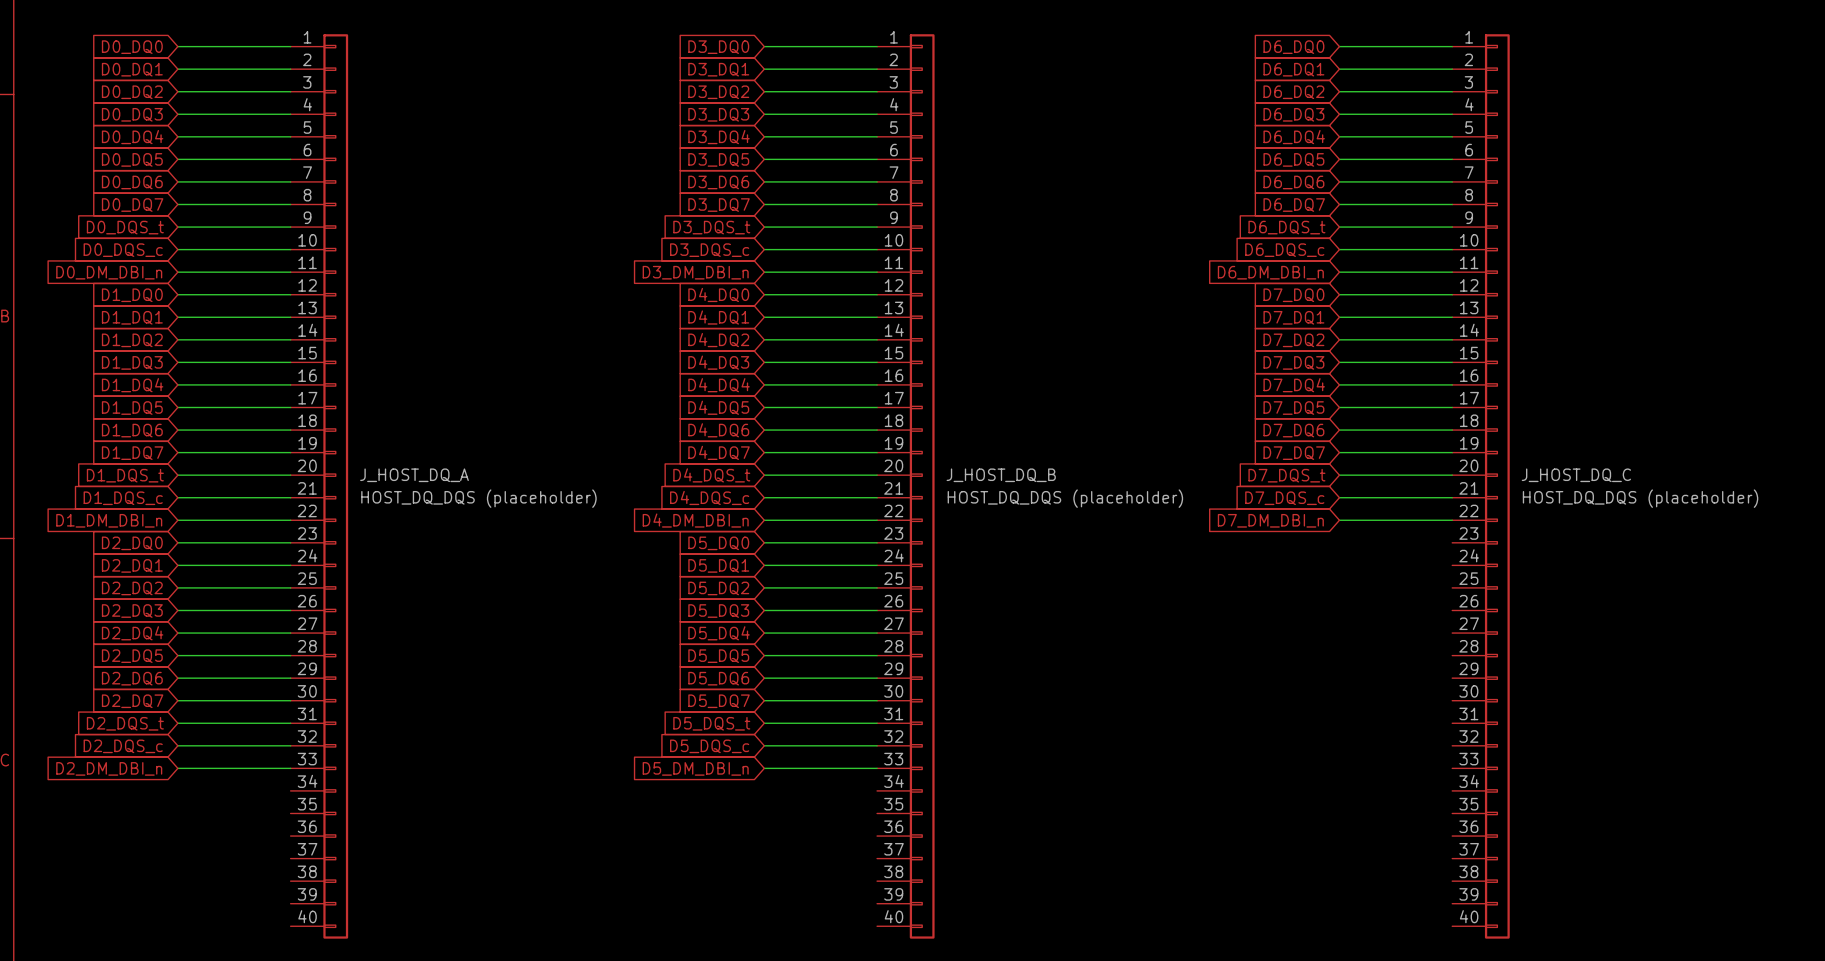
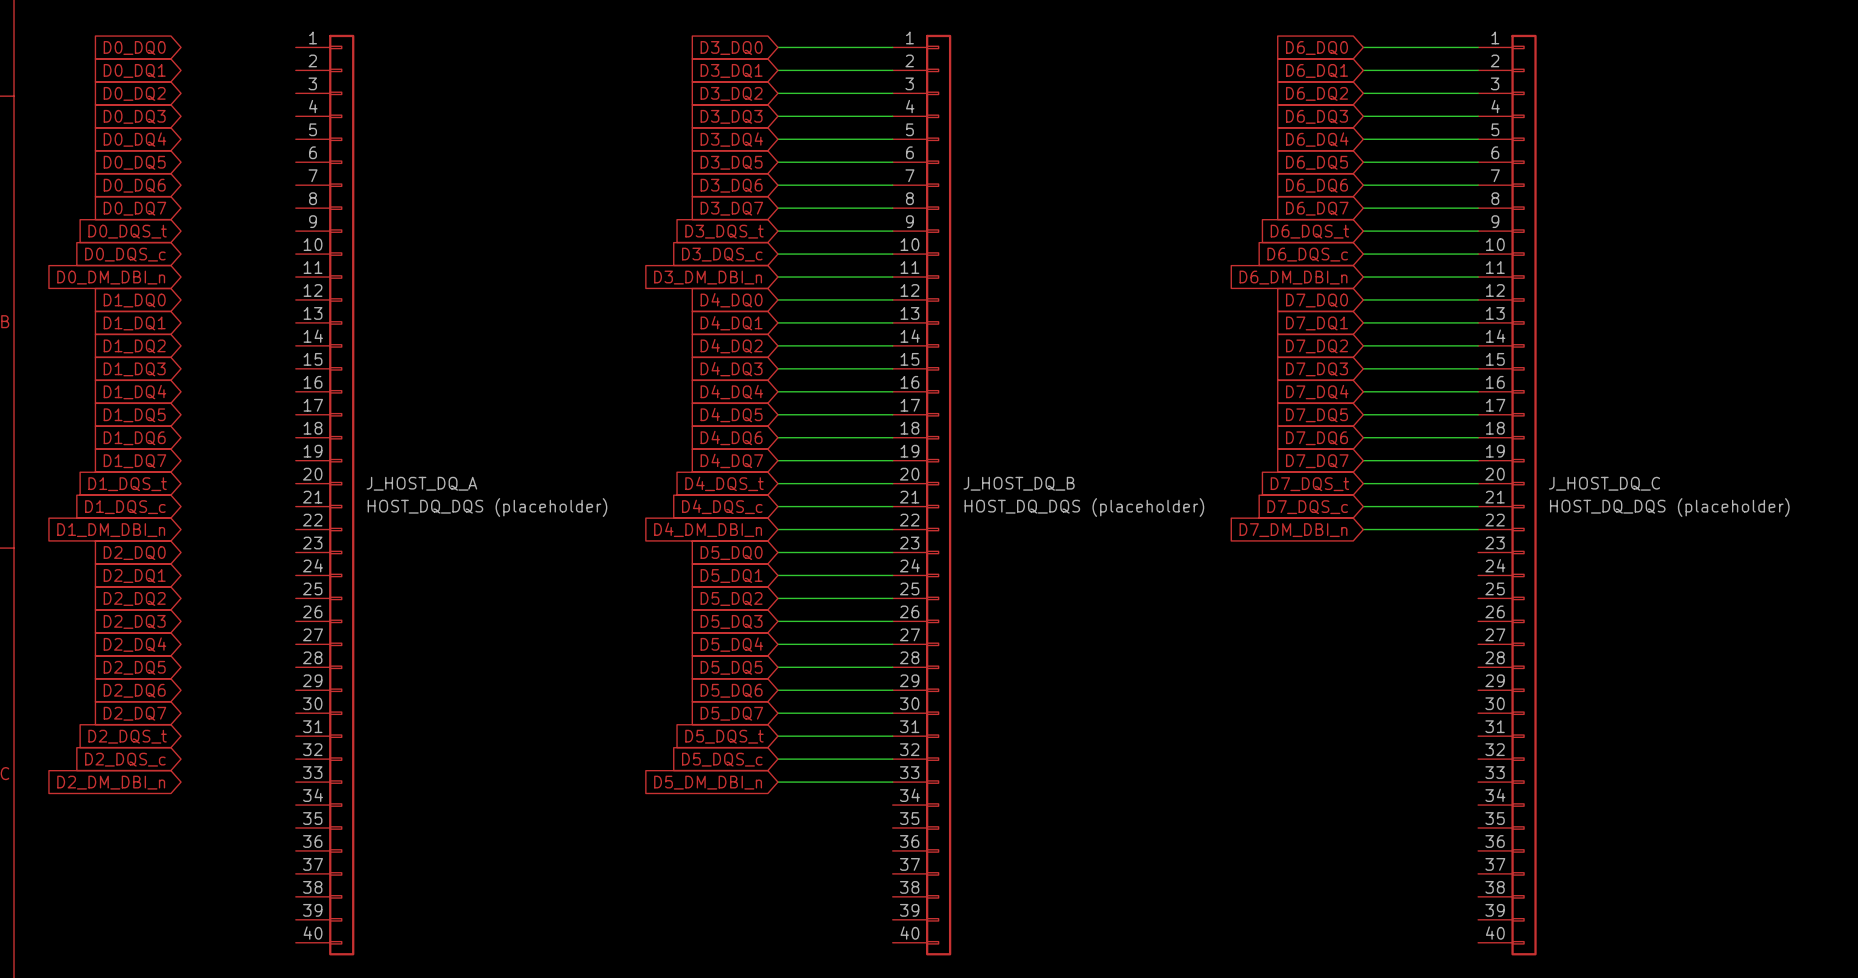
wire: (177, 46) (290, 46) -> none
wire: (177, 69) (290, 69) -> none
wire: (177, 91) (290, 91) -> none
wire: (177, 114) (290, 114) -> none
wire: (177, 136) (290, 136) -> none
wire: (177, 159) (290, 159) -> none
wire: (177, 181) (290, 181) -> none
wire: (177, 204) (290, 204) -> none
wire: (177, 227) (290, 227) -> none
wire: (177, 249) (290, 249) -> none
wire: (177, 272) (290, 272) -> none
wire: (177, 294) (290, 294) -> none
wire: (177, 317) (290, 317) -> none
wire: (177, 339) (290, 339) -> none
wire: (177, 362) (290, 362) -> none
wire: (177, 384) (290, 384) -> none
wire: (177, 407) (290, 407) -> none
wire: (177, 430) (290, 430) -> none
wire: (177, 452) (290, 452) -> none
wire: (177, 475) (290, 475) -> none
wire: (177, 497) (290, 497) -> none
wire: (177, 520) (290, 520) -> none
wire: (177, 542) (290, 542) -> none
wire: (177, 565) (290, 565) -> none
wire: (177, 587) (290, 587) -> none
wire: (177, 610) (290, 610) -> none
wire: (177, 633) (290, 633) -> none
wire: (177, 655) (290, 655) -> none
wire: (177, 678) (290, 678) -> none
wire: (177, 700) (290, 700) -> none
wire: (177, 723) (290, 723) -> none
wire: (177, 745) (290, 745) -> none
wire: (177, 768) (290, 768) -> none

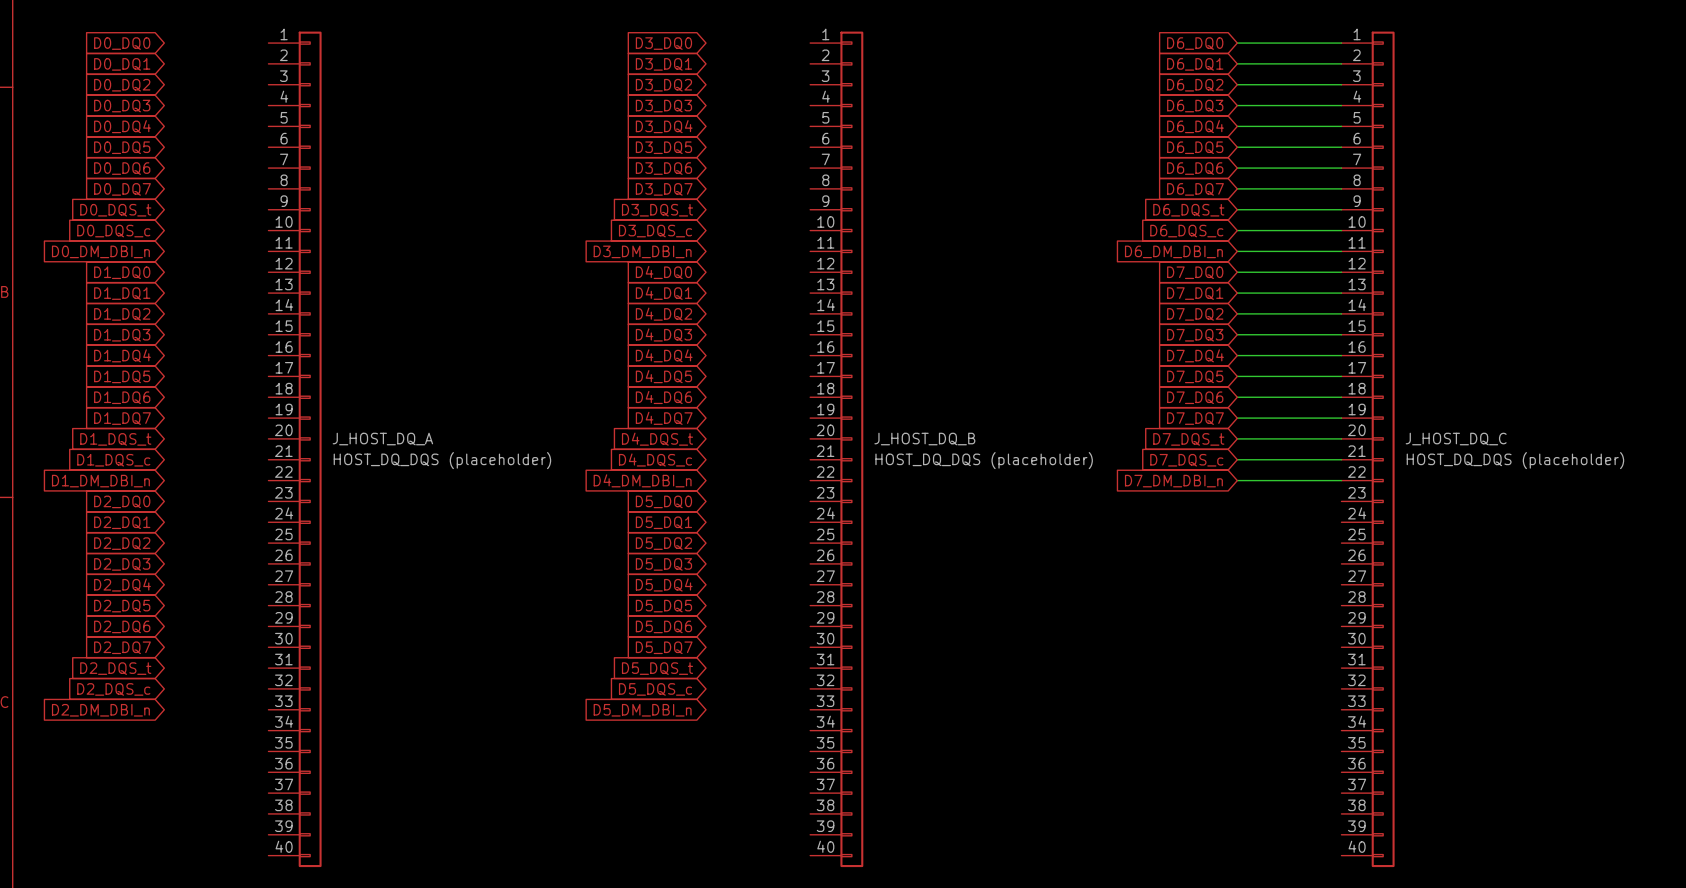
wire: (777, 47) (892, 47) -> none
wire: (777, 70) (892, 70) -> none
wire: (777, 93) (892, 93) -> none
wire: (777, 116) (892, 116) -> none
wire: (777, 139) (892, 139) -> none
wire: (777, 162) (892, 162) -> none
wire: (777, 185) (892, 185) -> none
wire: (777, 208) (892, 208) -> none
wire: (777, 231) (892, 231) -> none
wire: (777, 254) (892, 254) -> none
wire: (777, 277) (892, 277) -> none
wire: (777, 299) (892, 299) -> none
wire: (777, 322) (892, 322) -> none
wire: (777, 345) (892, 345) -> none
wire: (777, 368) (892, 368) -> none
wire: (777, 391) (892, 391) -> none
wire: (777, 414) (892, 414) -> none
wire: (777, 437) (892, 437) -> none
wire: (777, 460) (892, 460) -> none
wire: (777, 483) (892, 483) -> none
wire: (777, 506) (892, 506) -> none
wire: (777, 529) (892, 529) -> none
wire: (777, 552) (892, 552) -> none
wire: (777, 575) (892, 575) -> none
wire: (777, 598) (892, 598) -> none
wire: (777, 621) (892, 621) -> none
wire: (777, 644) (892, 644) -> none
wire: (777, 667) (892, 667) -> none
wire: (777, 690) (892, 690) -> none
wire: (777, 713) (892, 713) -> none
wire: (777, 736) (892, 736) -> none
wire: (777, 759) (892, 759) -> none
wire: (777, 782) (892, 782) -> none

